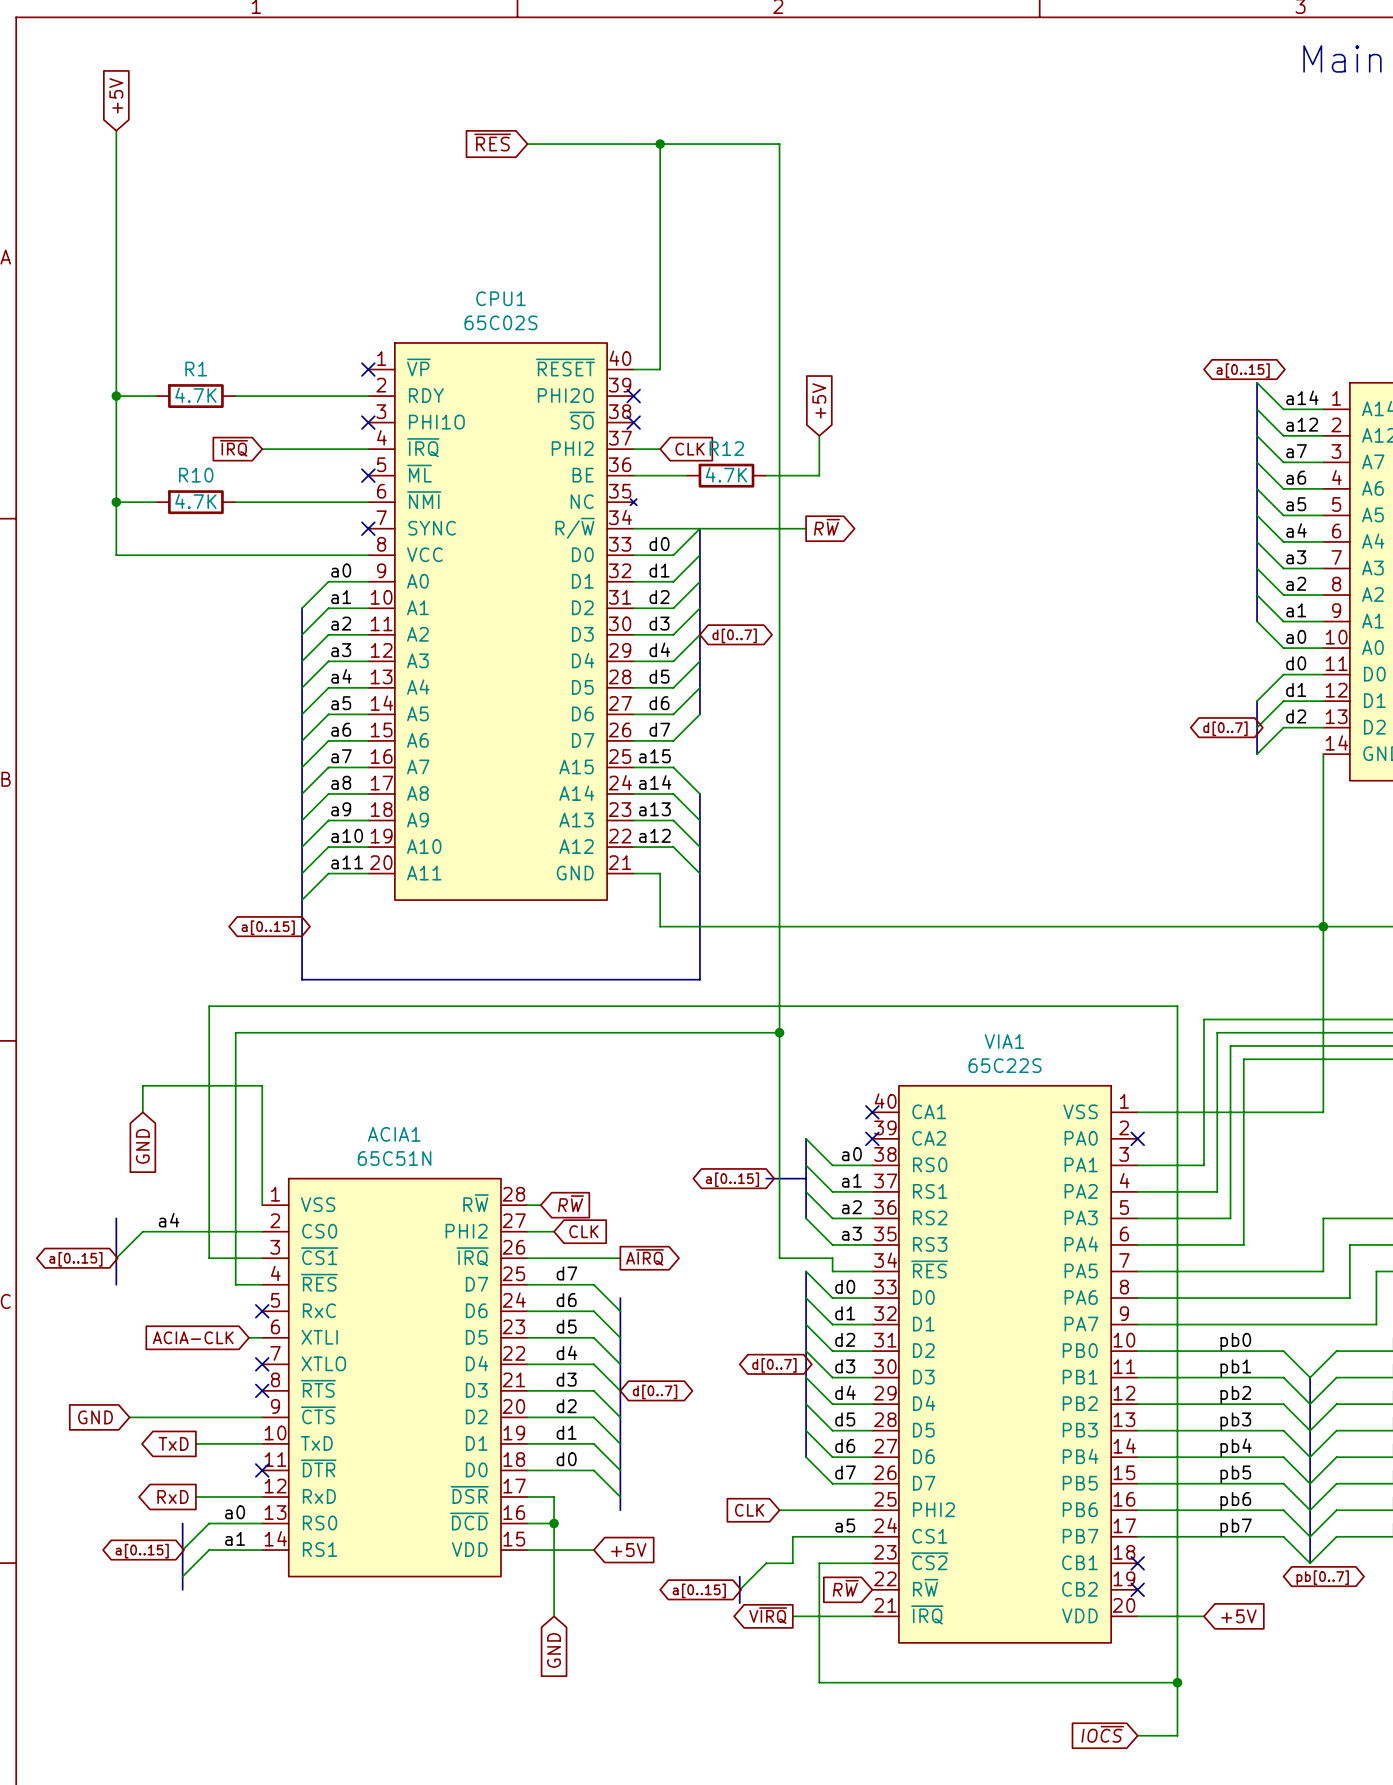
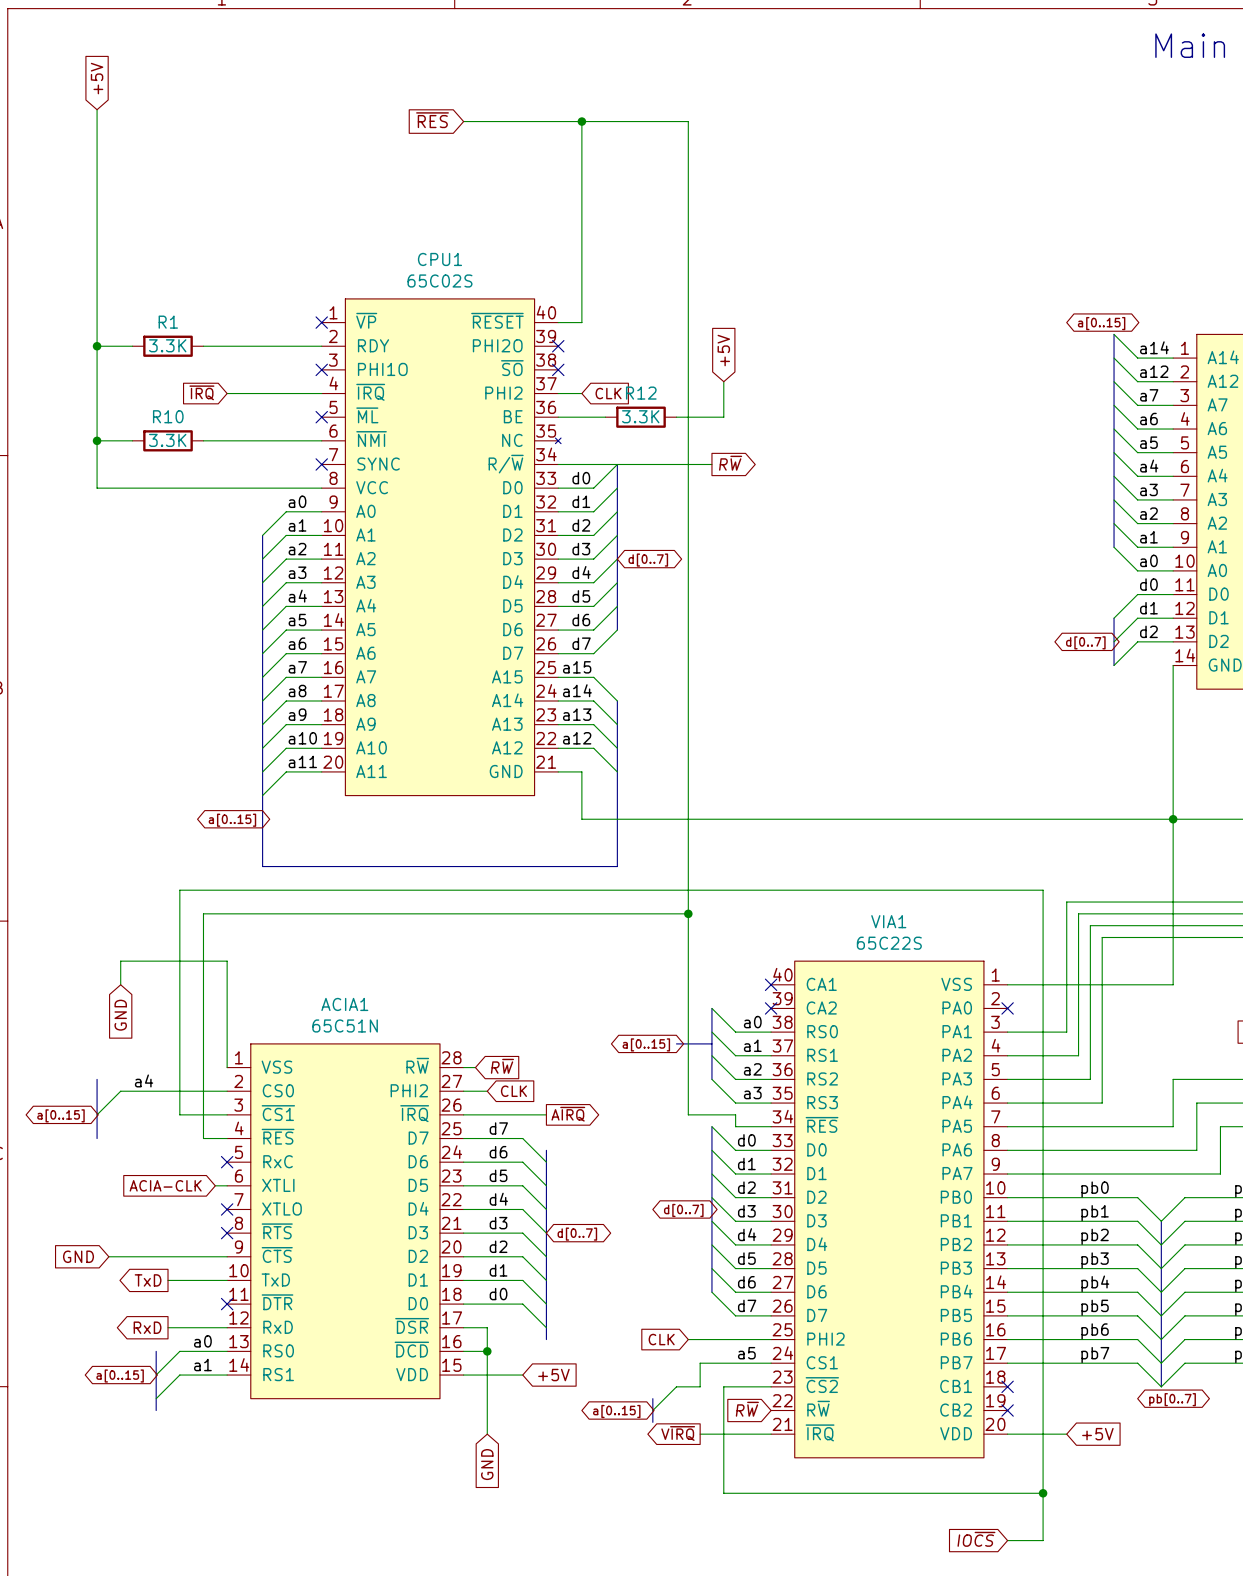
R1 value: 4.7K (195, 395) -> 3.3K (167, 345)
R12 value: 4.7K (726, 474) -> 3.3K (640, 416)
R10 value: 4.7K (195, 501) -> 3.3K (167, 440)

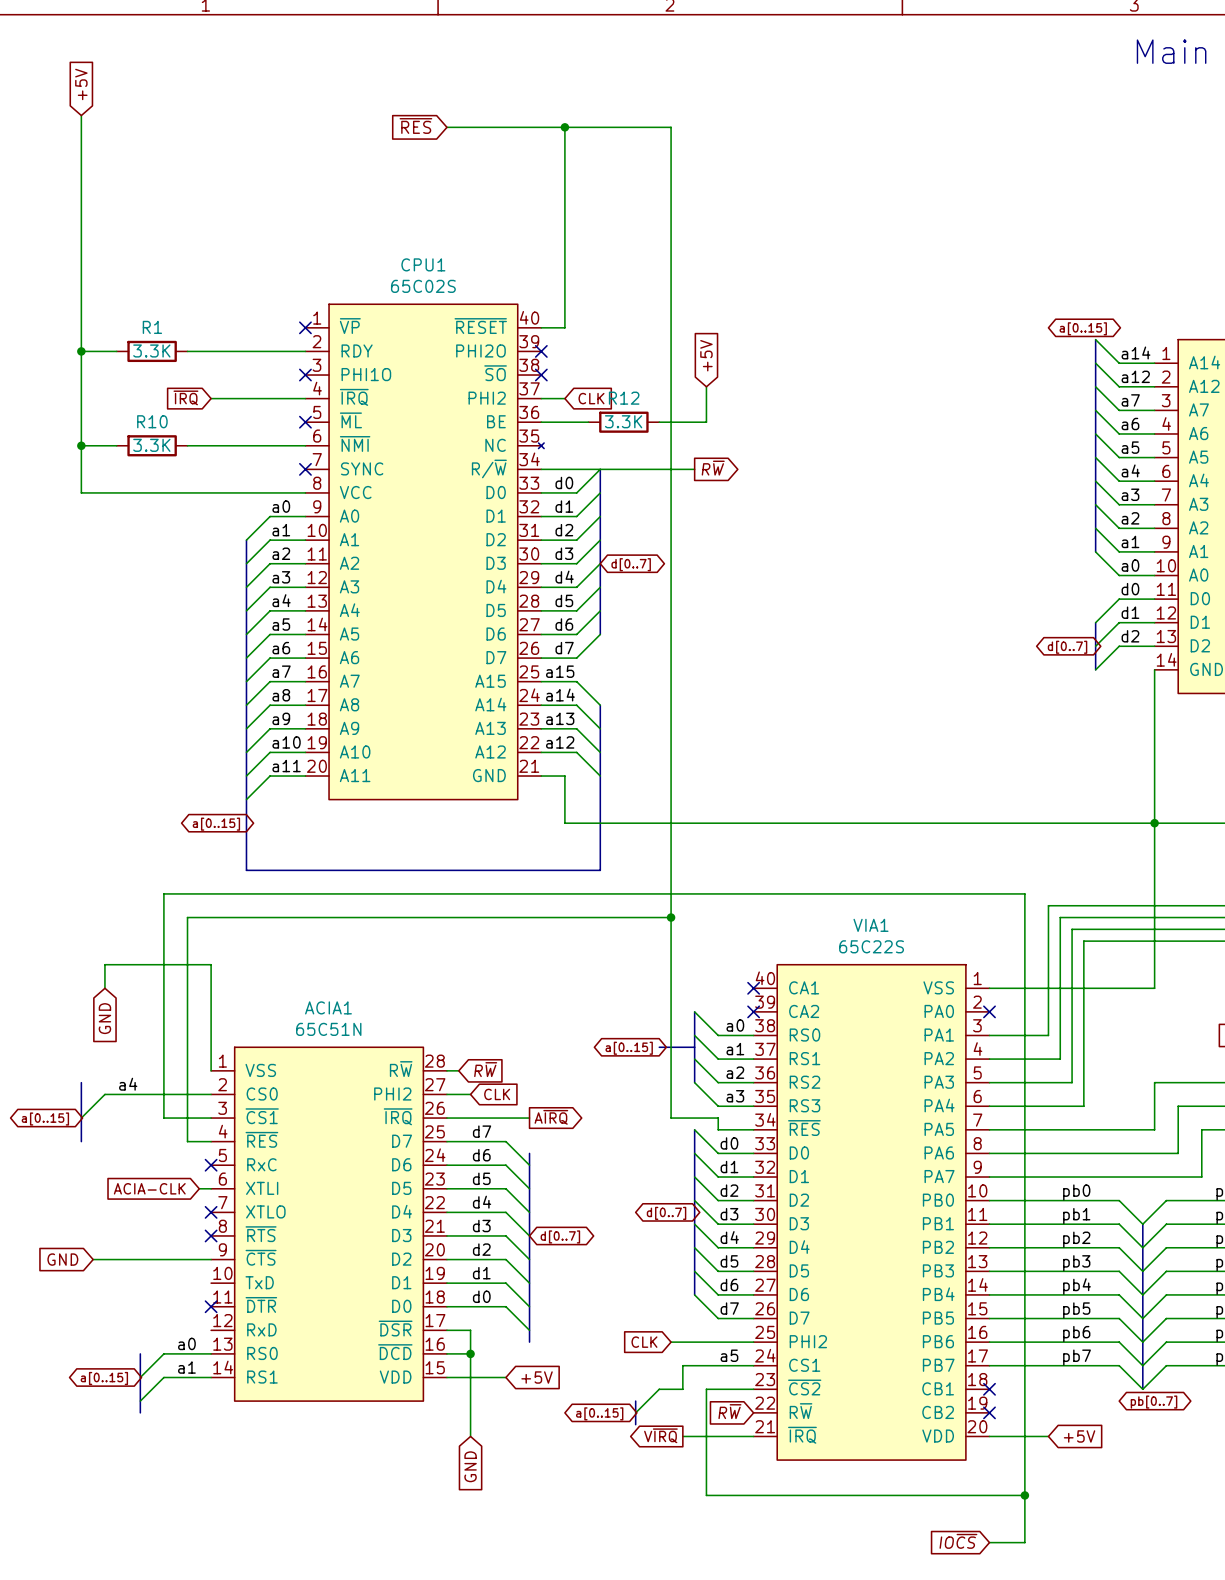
global label: TxD (148, 1280) -> none
wire: (168, 1280) (227, 1280) -> none
global label: RxD (147, 1327) -> none
wire: (168, 1327) (227, 1327) -> none

